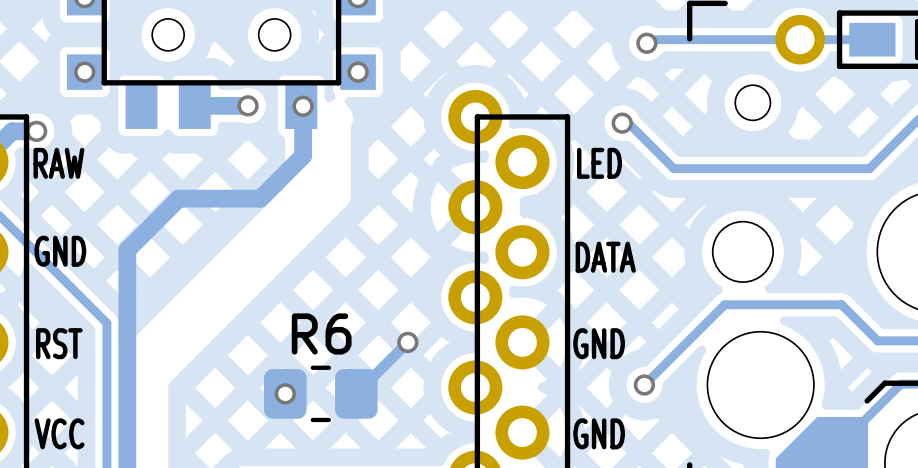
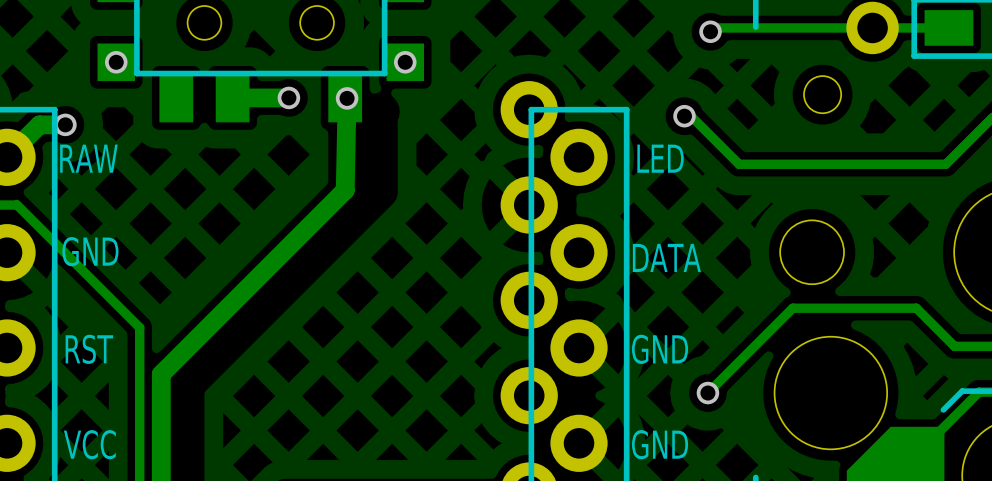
track: (303, 106) (303, 156) (260, 198) (178, 198) (127, 250) (127, 367) -> (347, 98) (345, 190) (161, 374)
track: (407, 342) (356, 393) -> none
via: (407, 342) -> none
via: (285, 393) -> none
R6: (320, 393) -> none

